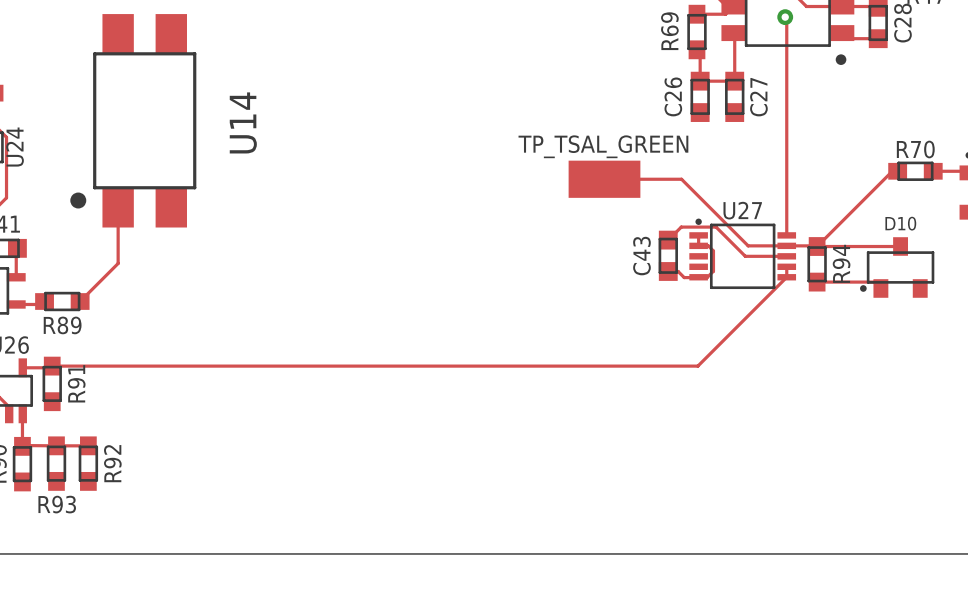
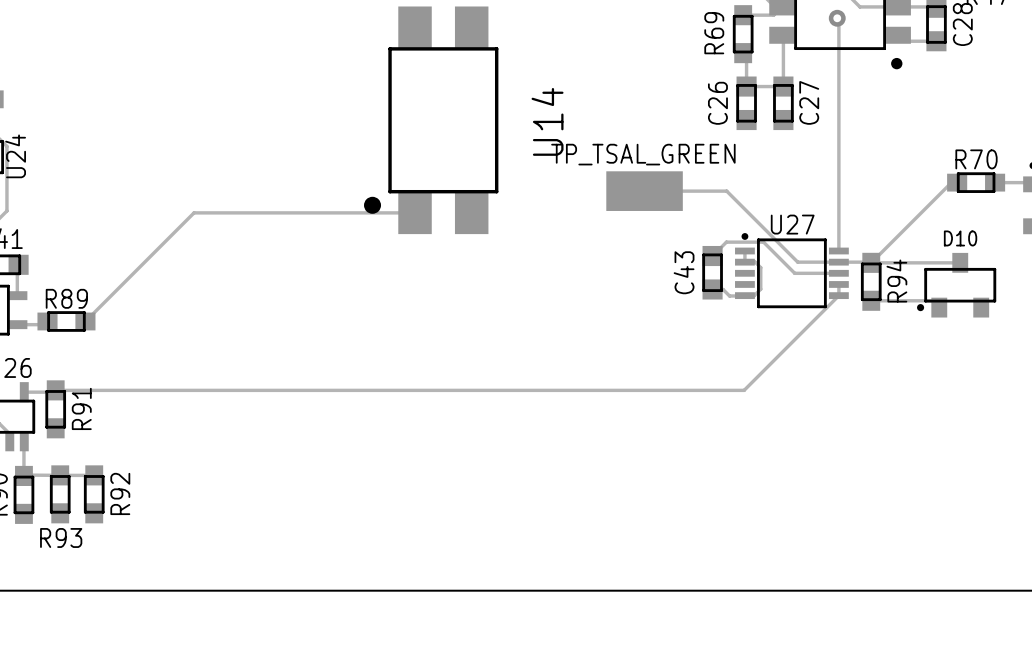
U14 position: (133, 120) -> (431, 120)
track: (118, 207) (118, 263) -> (415, 212) (194, 212) (125, 280)
R89 name position: R89 (62, 325) -> R89 (66, 298)

